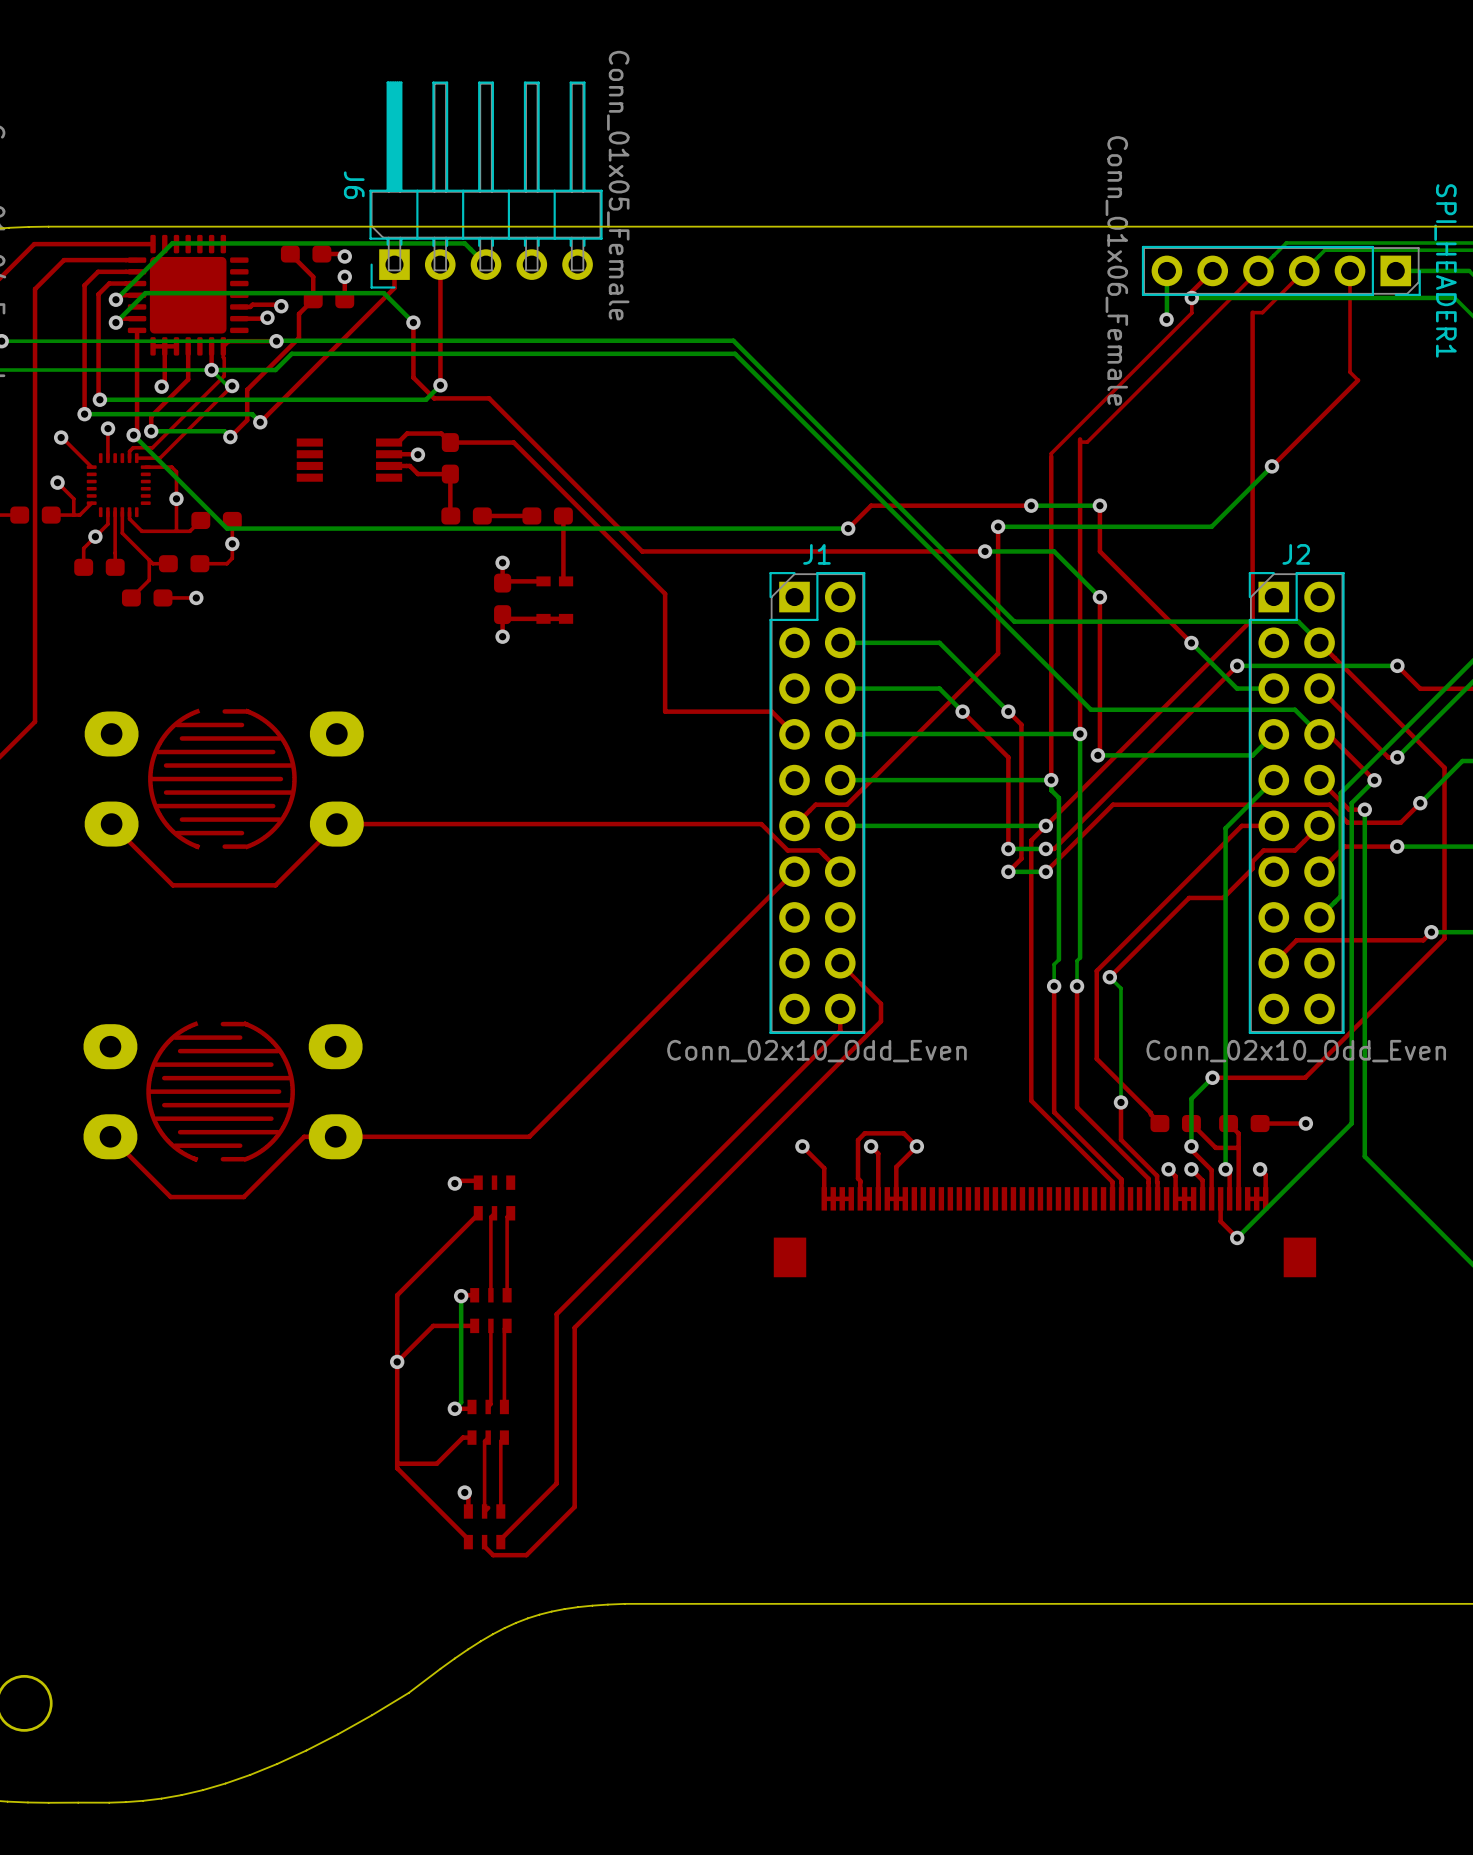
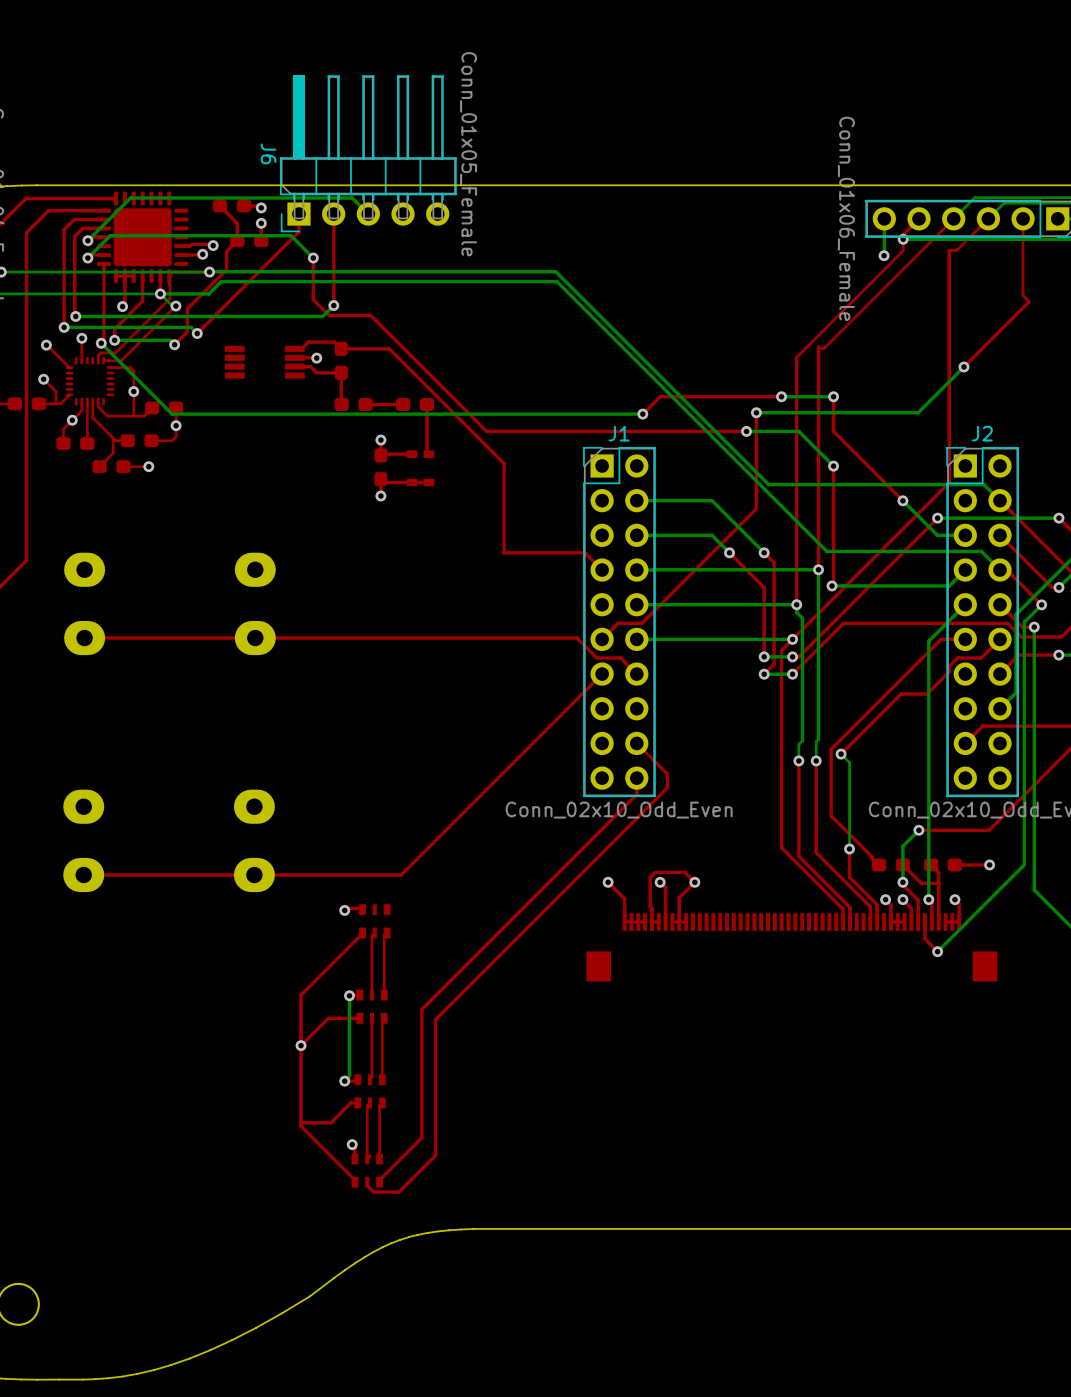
part: (222, 779) -> none
top track: (336, 824) (275, 885) (172, 885) (111, 824) -> (255, 638) (84, 638)
part: (220, 1091) -> none
top track: (304, 1136) (243, 1197) (170, 1197) (110, 1136) -> (230, 875) (83, 875)

